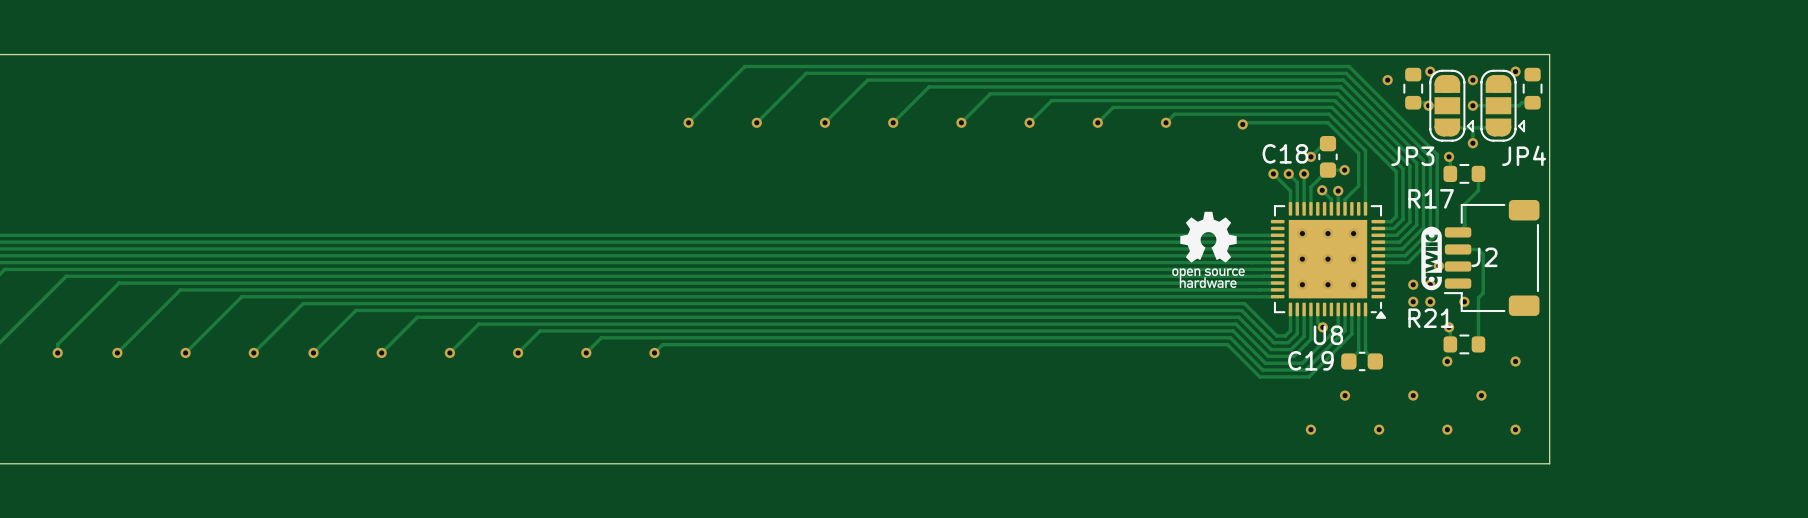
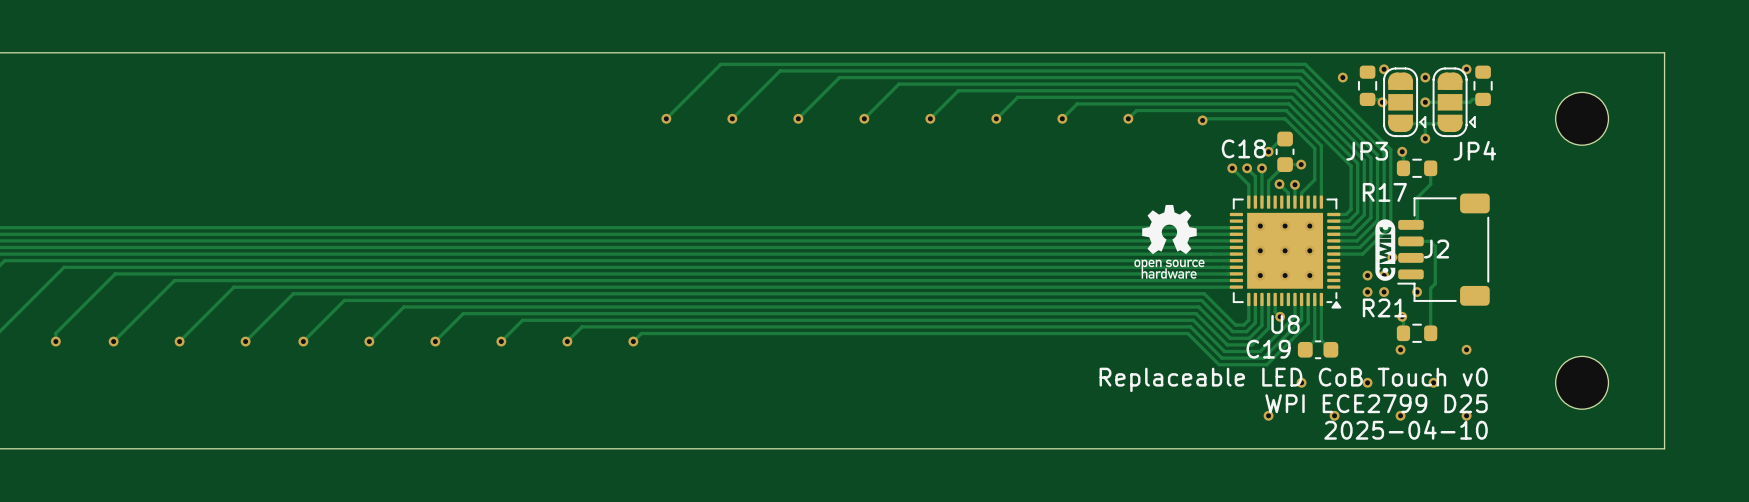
board edge: (1549, 54) (1549, 463) -> (1499, 52) (1664, 52) (1664, 448) (1499, 448)
part: none -> (1582, 118)
text: none -> Replaceable LED CoB Touch v0 (1293, 379)
part: none -> (1582, 382)
text: none -> WPI ECE2799 D25 (1376, 403)
text: none -> 2025-04-10 (1406, 429)

